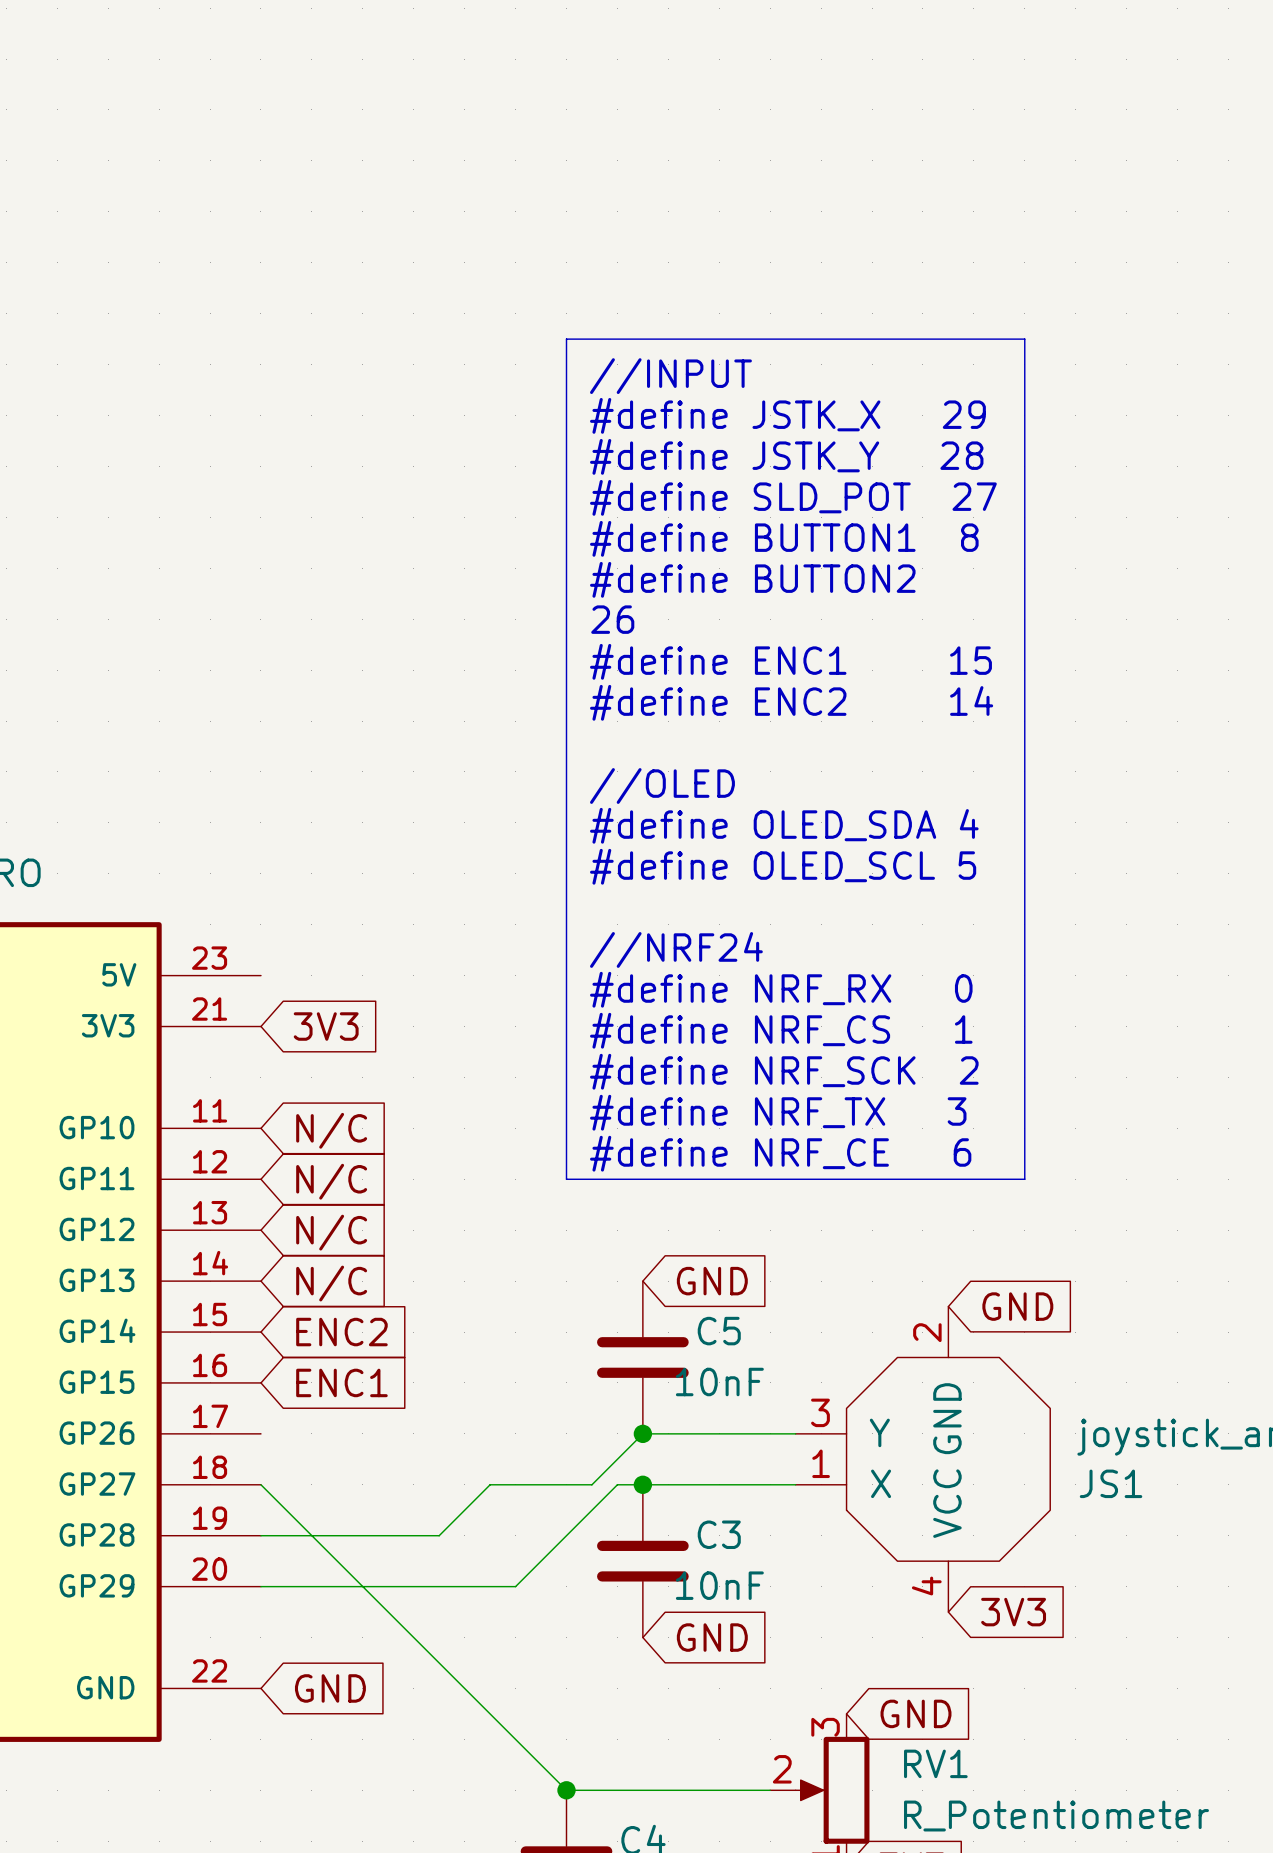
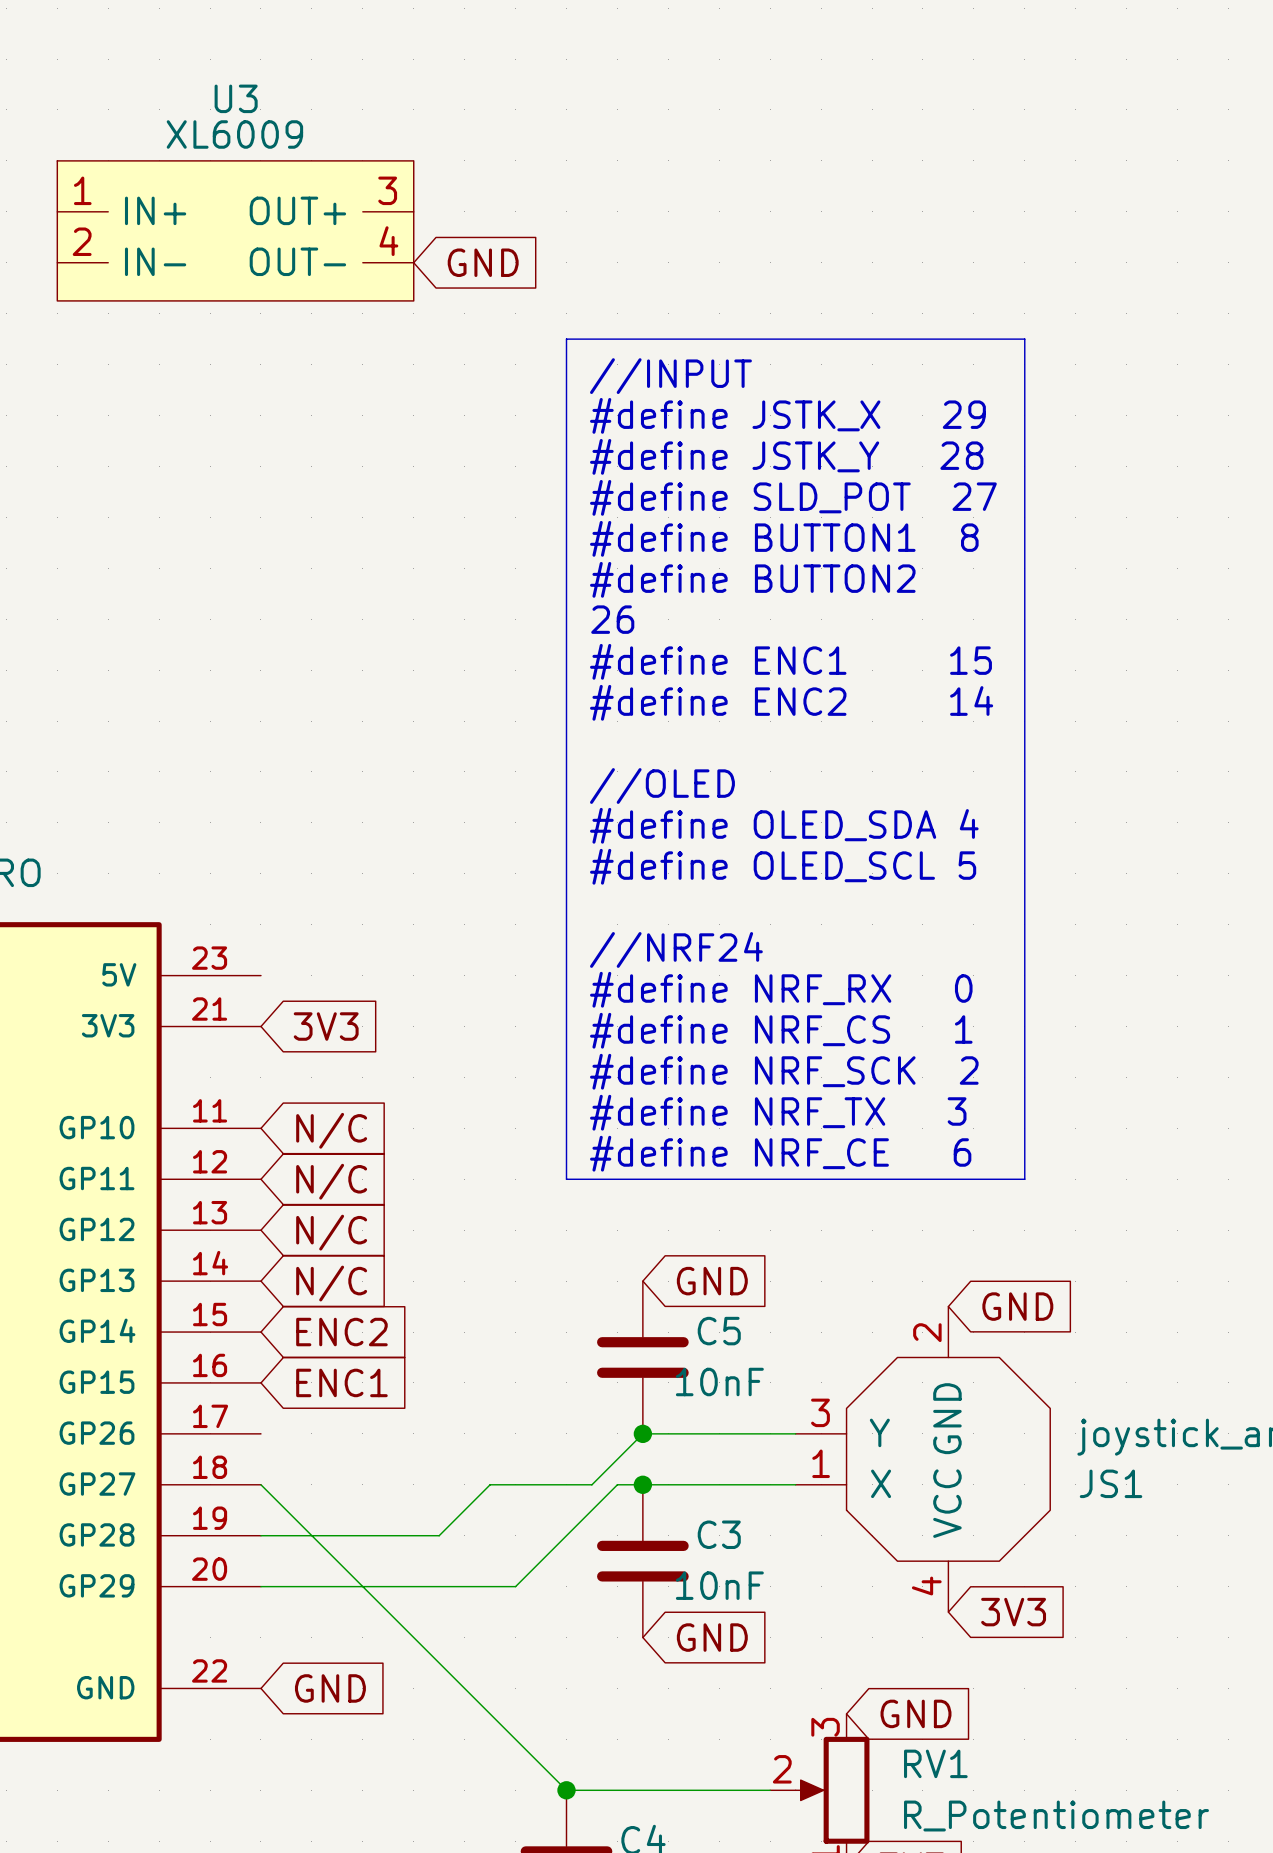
U3: none -> XL6009 (235, 230)
global label: none -> GND (483, 262)

